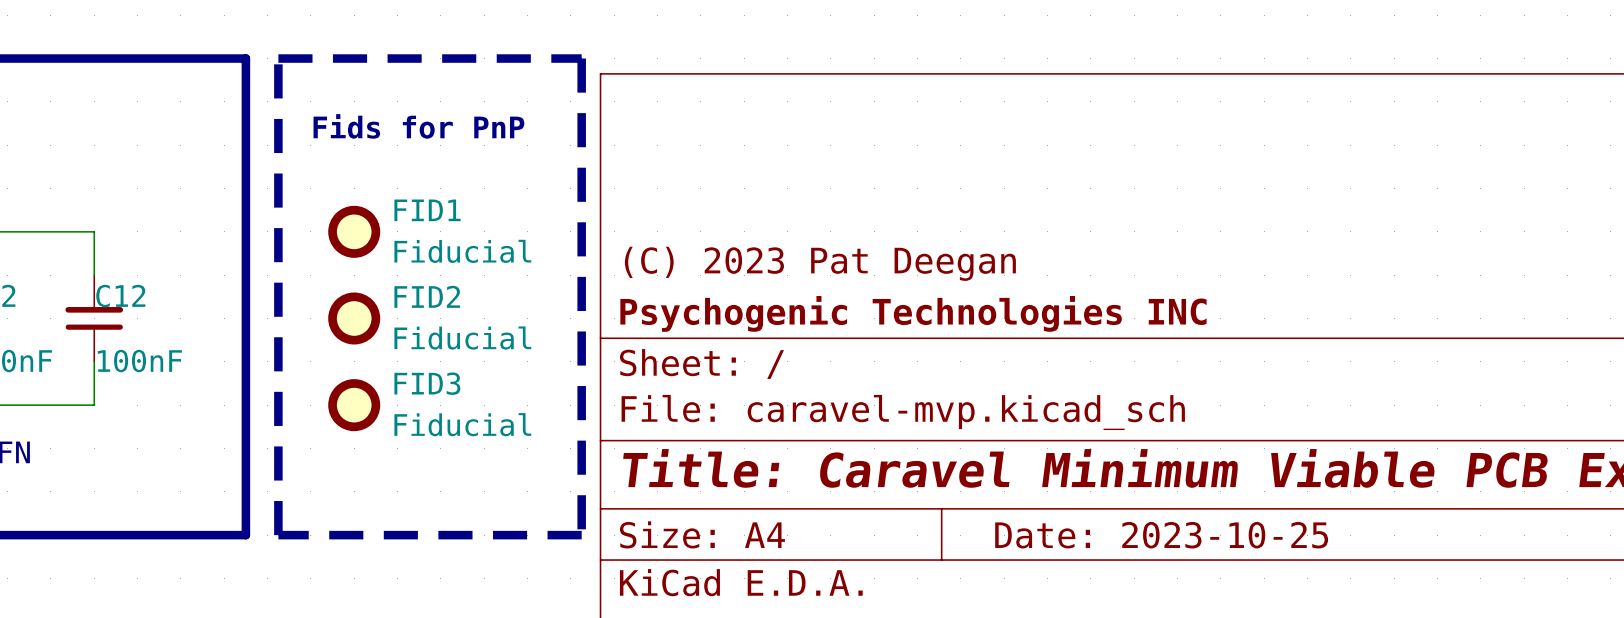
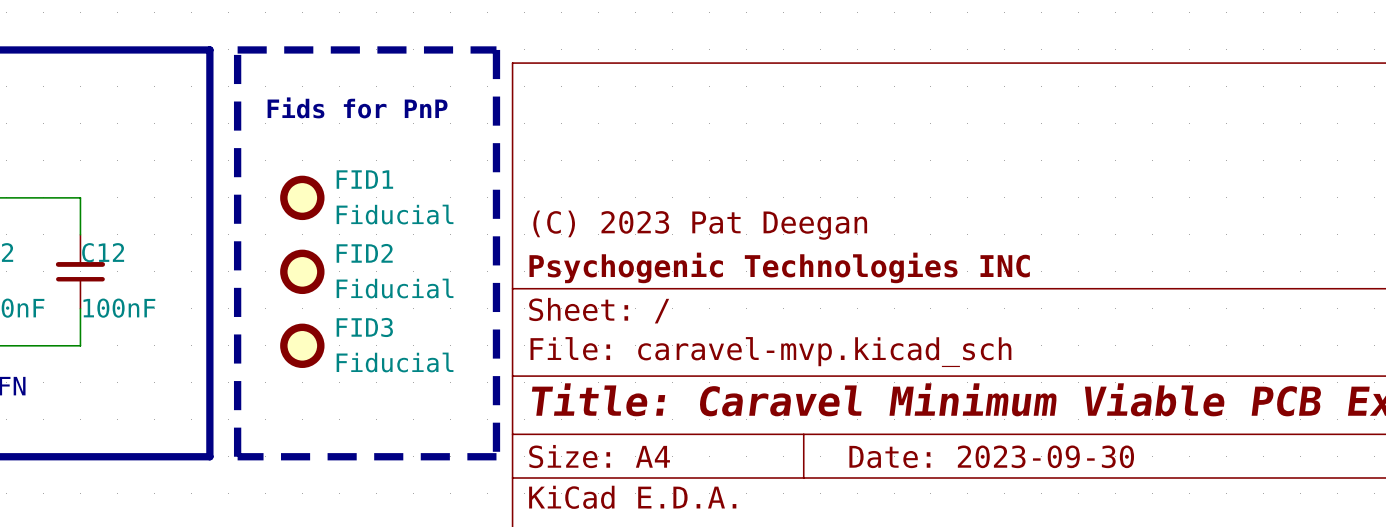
title block: Date: 2023-10-25 (1161, 535) -> Date: 2023-09-30 (991, 456)

